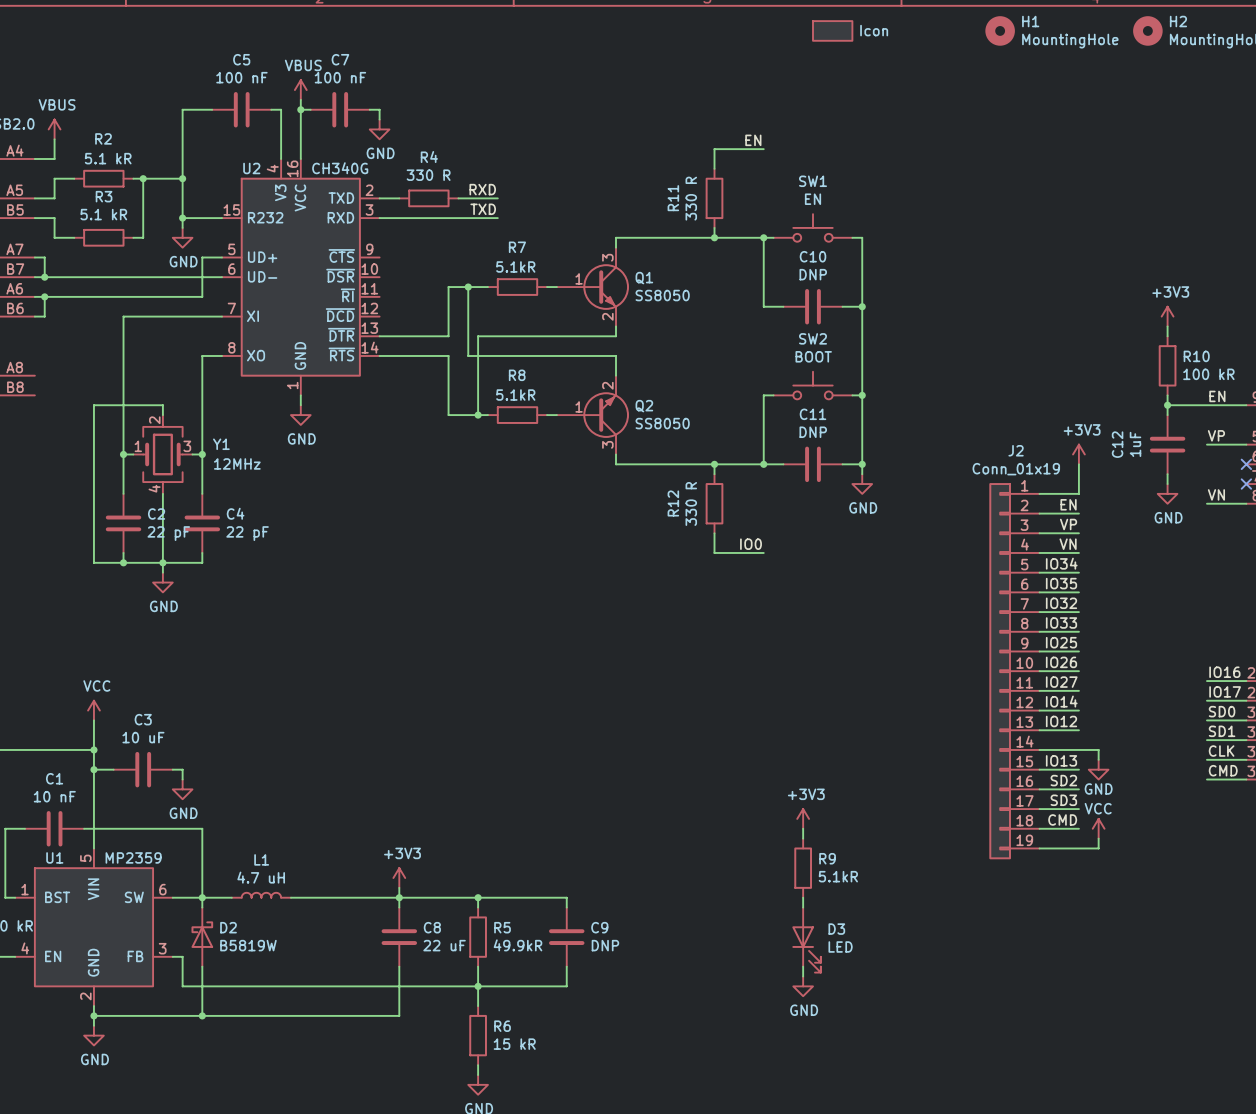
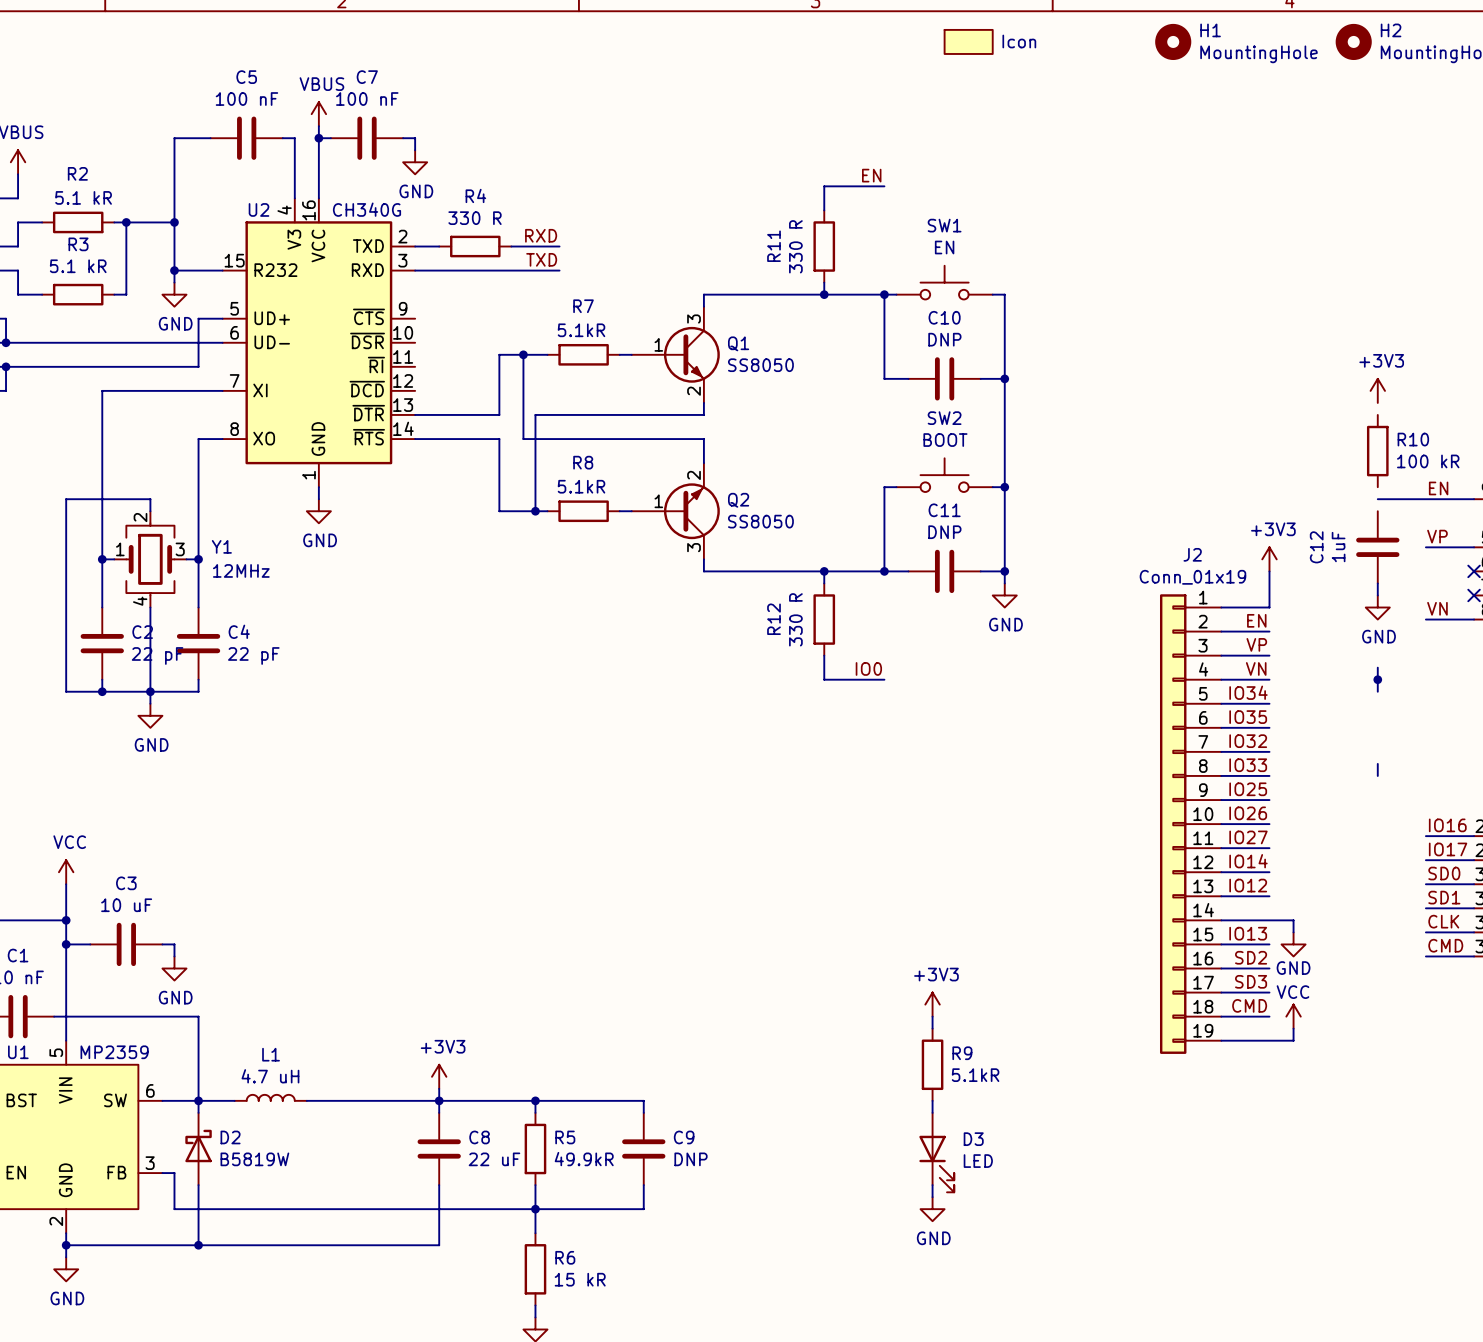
wire: (1167, 326) (1167, 336) -> none
wire: (1167, 395) (1167, 415) -> (1377, 667) (1377, 691)
junction: (1167, 405) -> none
junction: none -> (1377, 679)
wire: none -> (1377, 763) (1377, 775)

